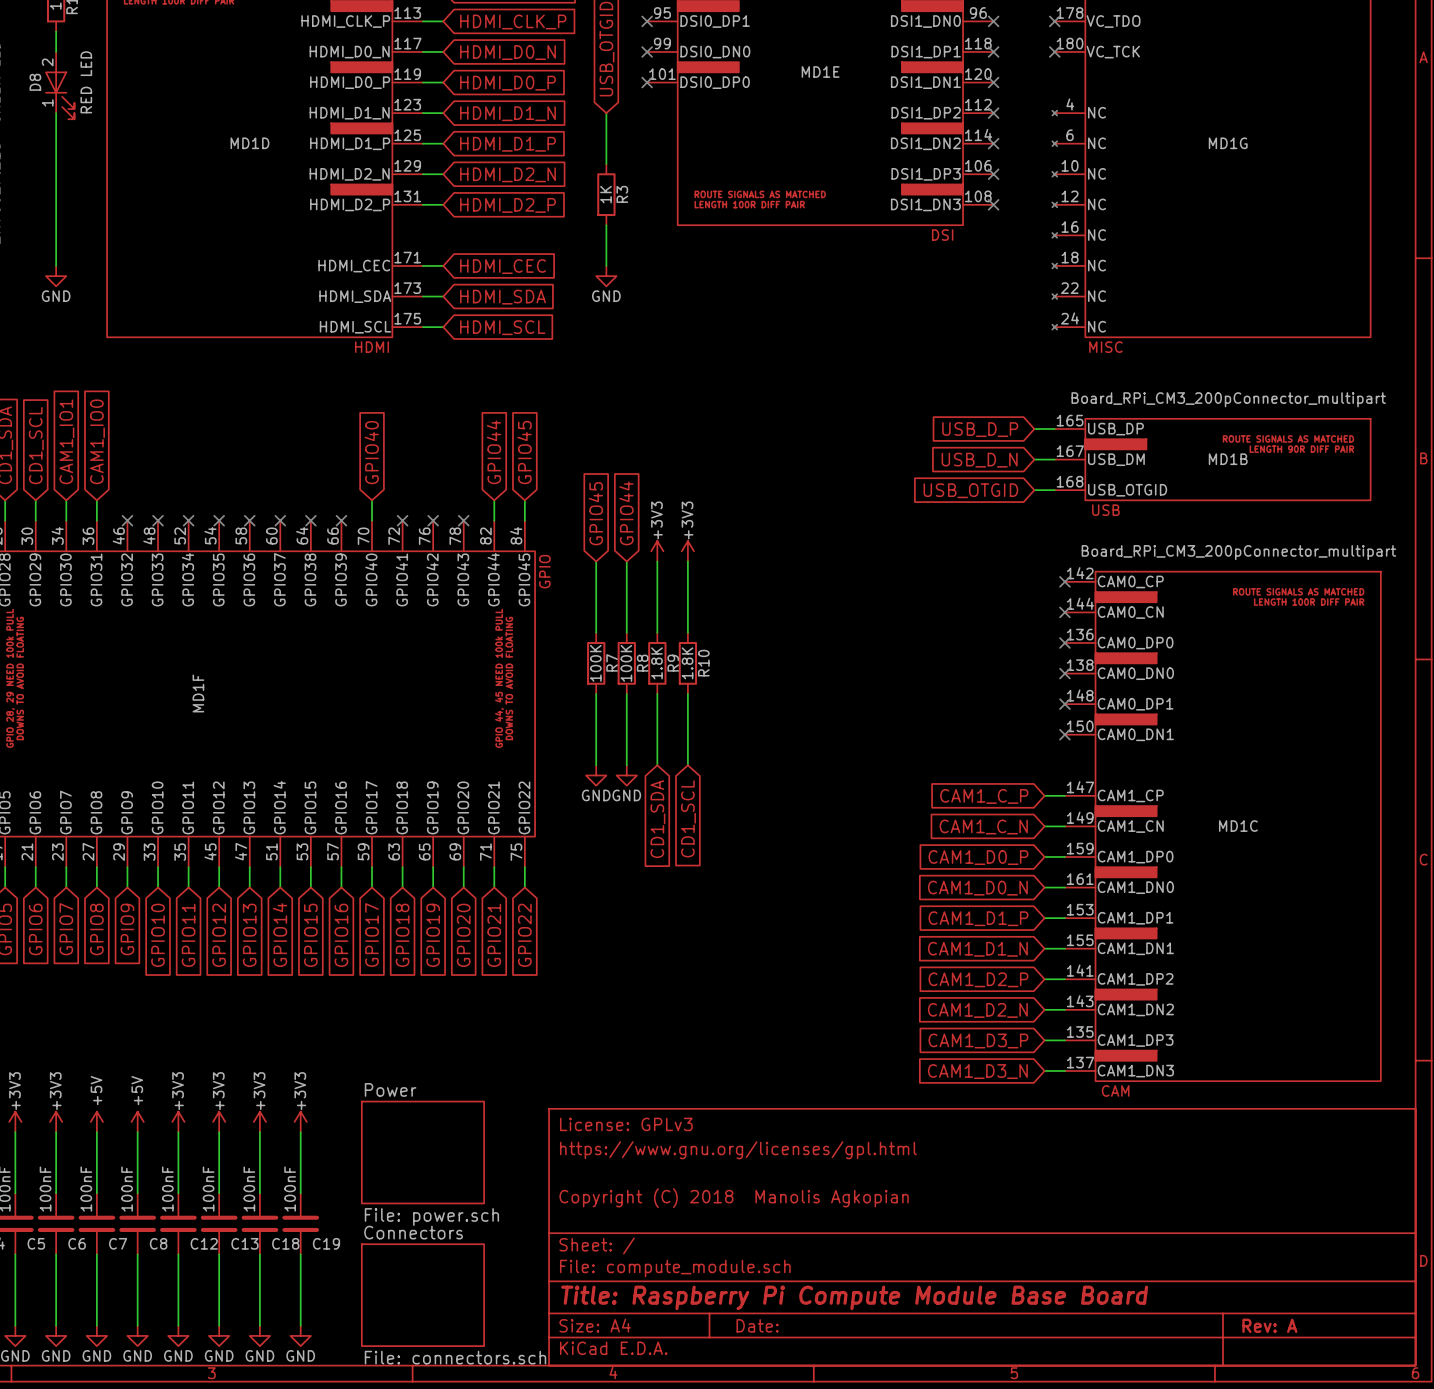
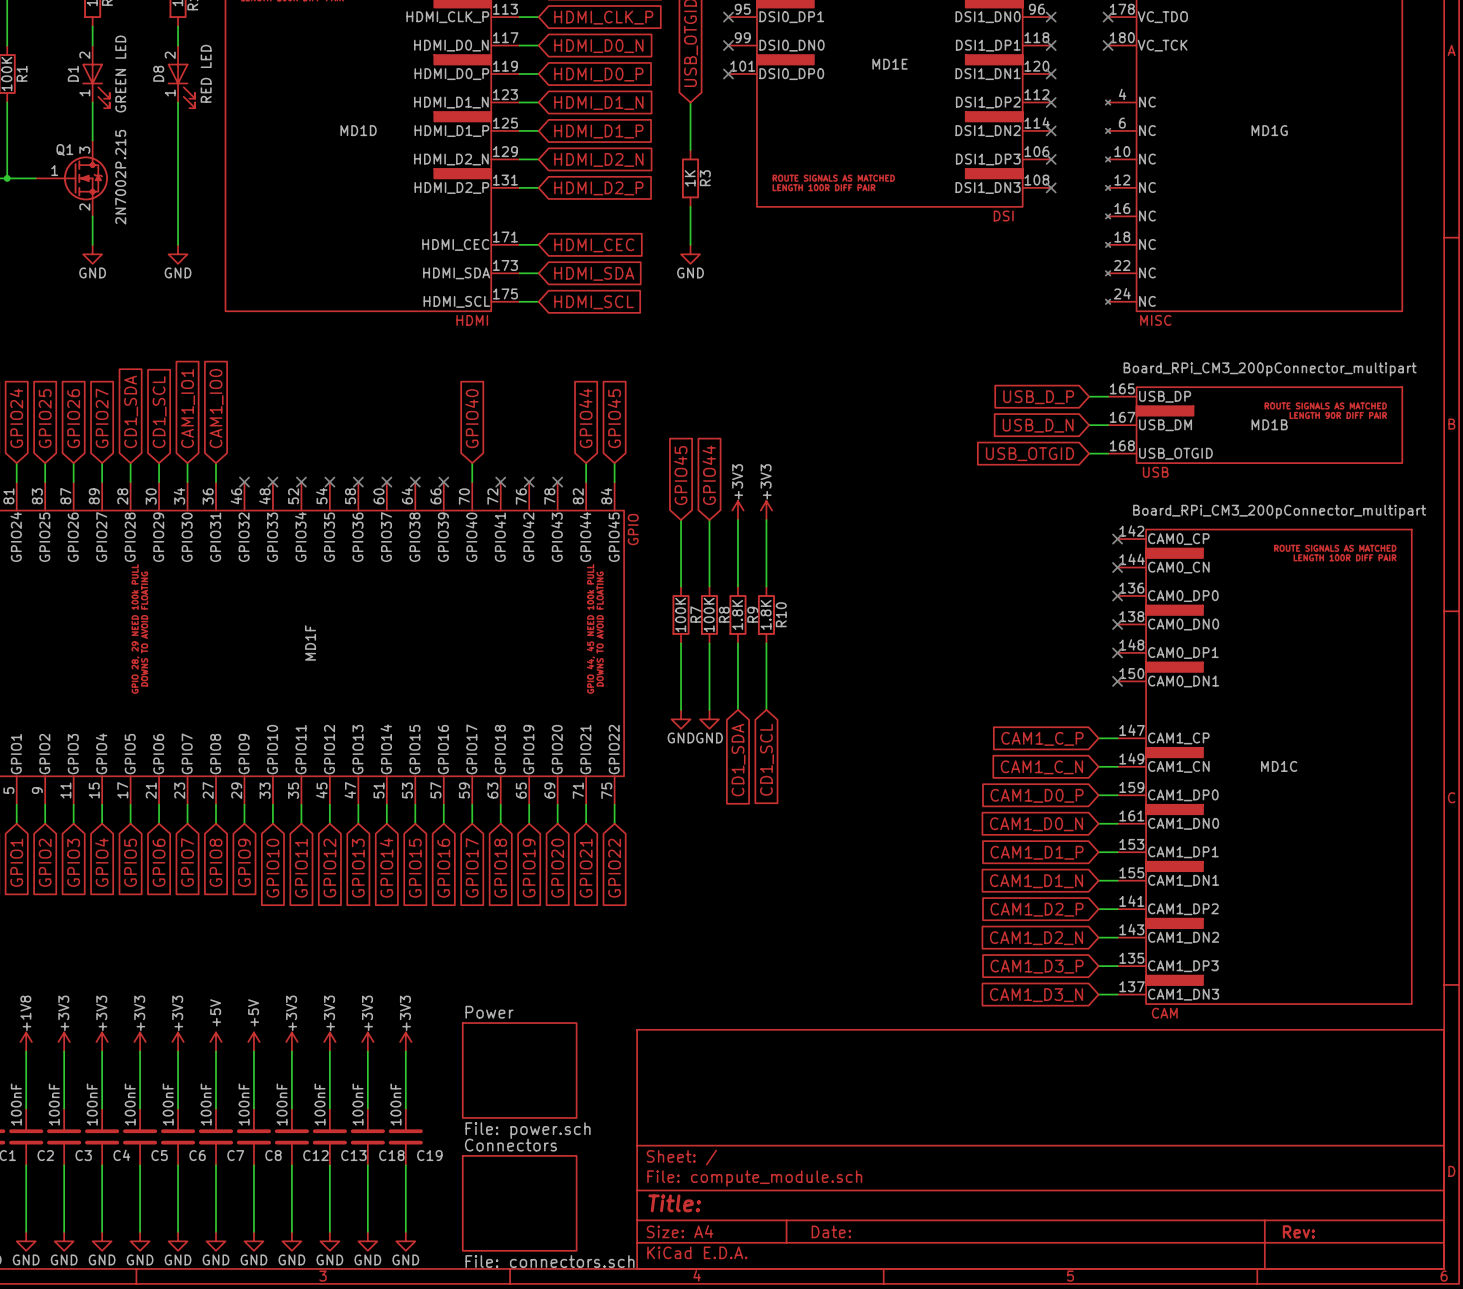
title block: License: GPLv3 (626, 1124) -> none
title block: https://www.gnu.org/licenses/gpl.html (738, 1150) -> none
title block: Copyright (C) 2018 Manolis Agkopian (734, 1198) -> none
title block: Title: Raspberry Pi Compute Module Base Board (854, 1297) -> Title: (674, 1203)
title block: Rev: A (1269, 1325) -> Rev: (1298, 1231)

